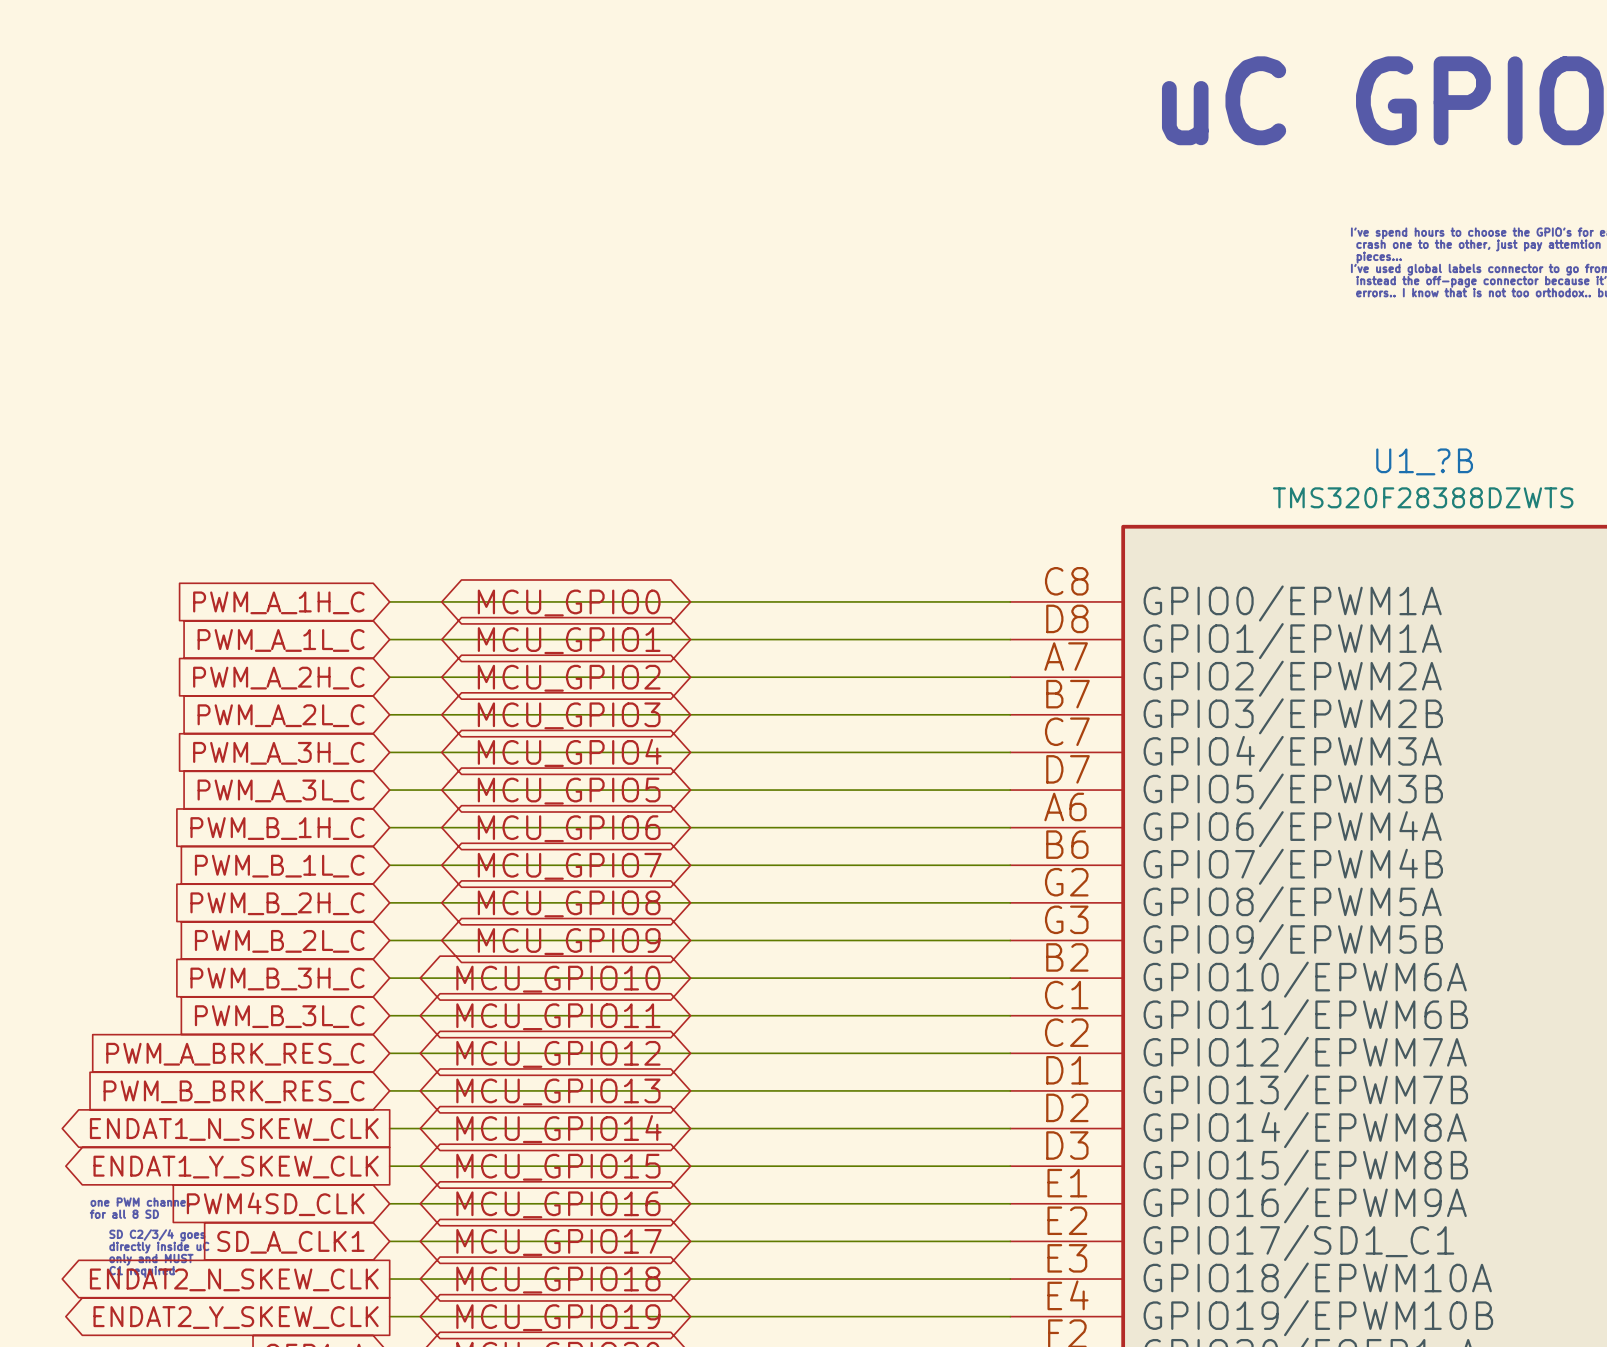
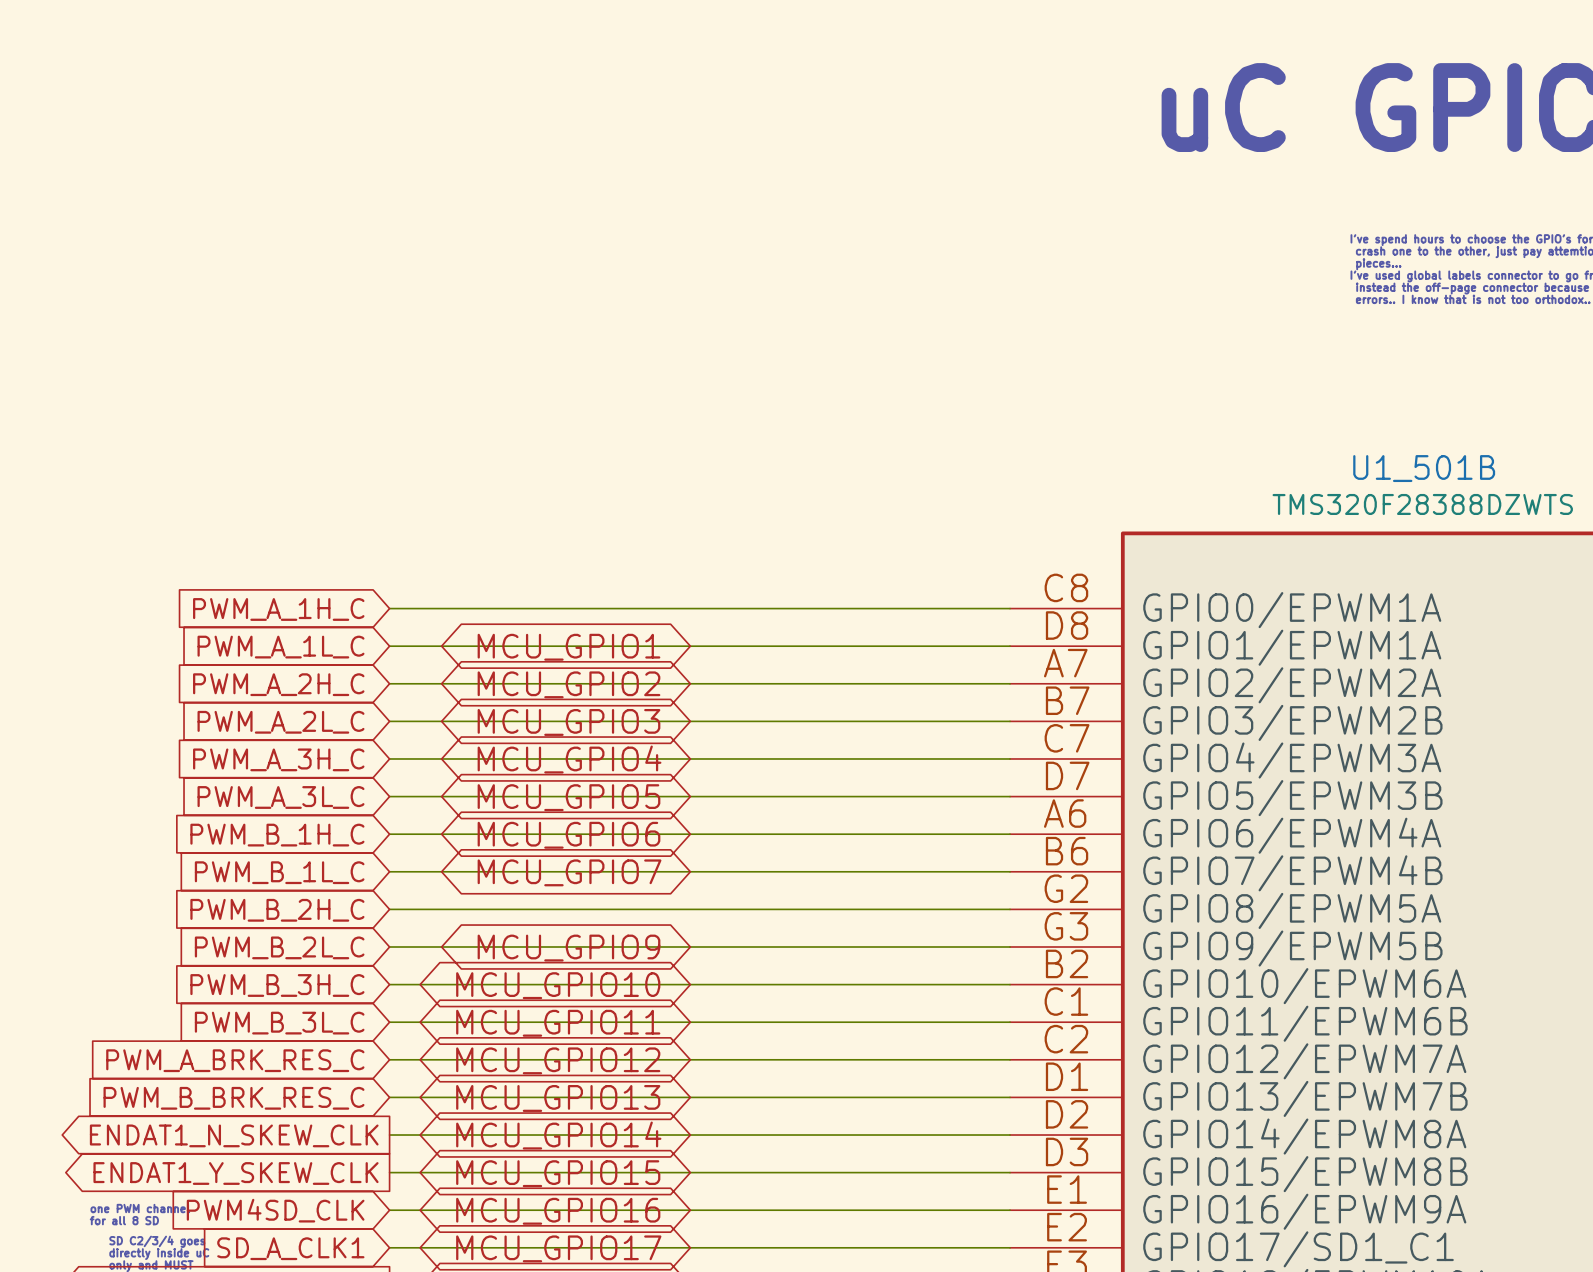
U1_?B name: U1_?B (1424, 461) -> U1_501B (1424, 468)
global label: MCU_GPIO0 (569, 603) -> none
global label: MCU_GPIO8 (569, 903) -> none

